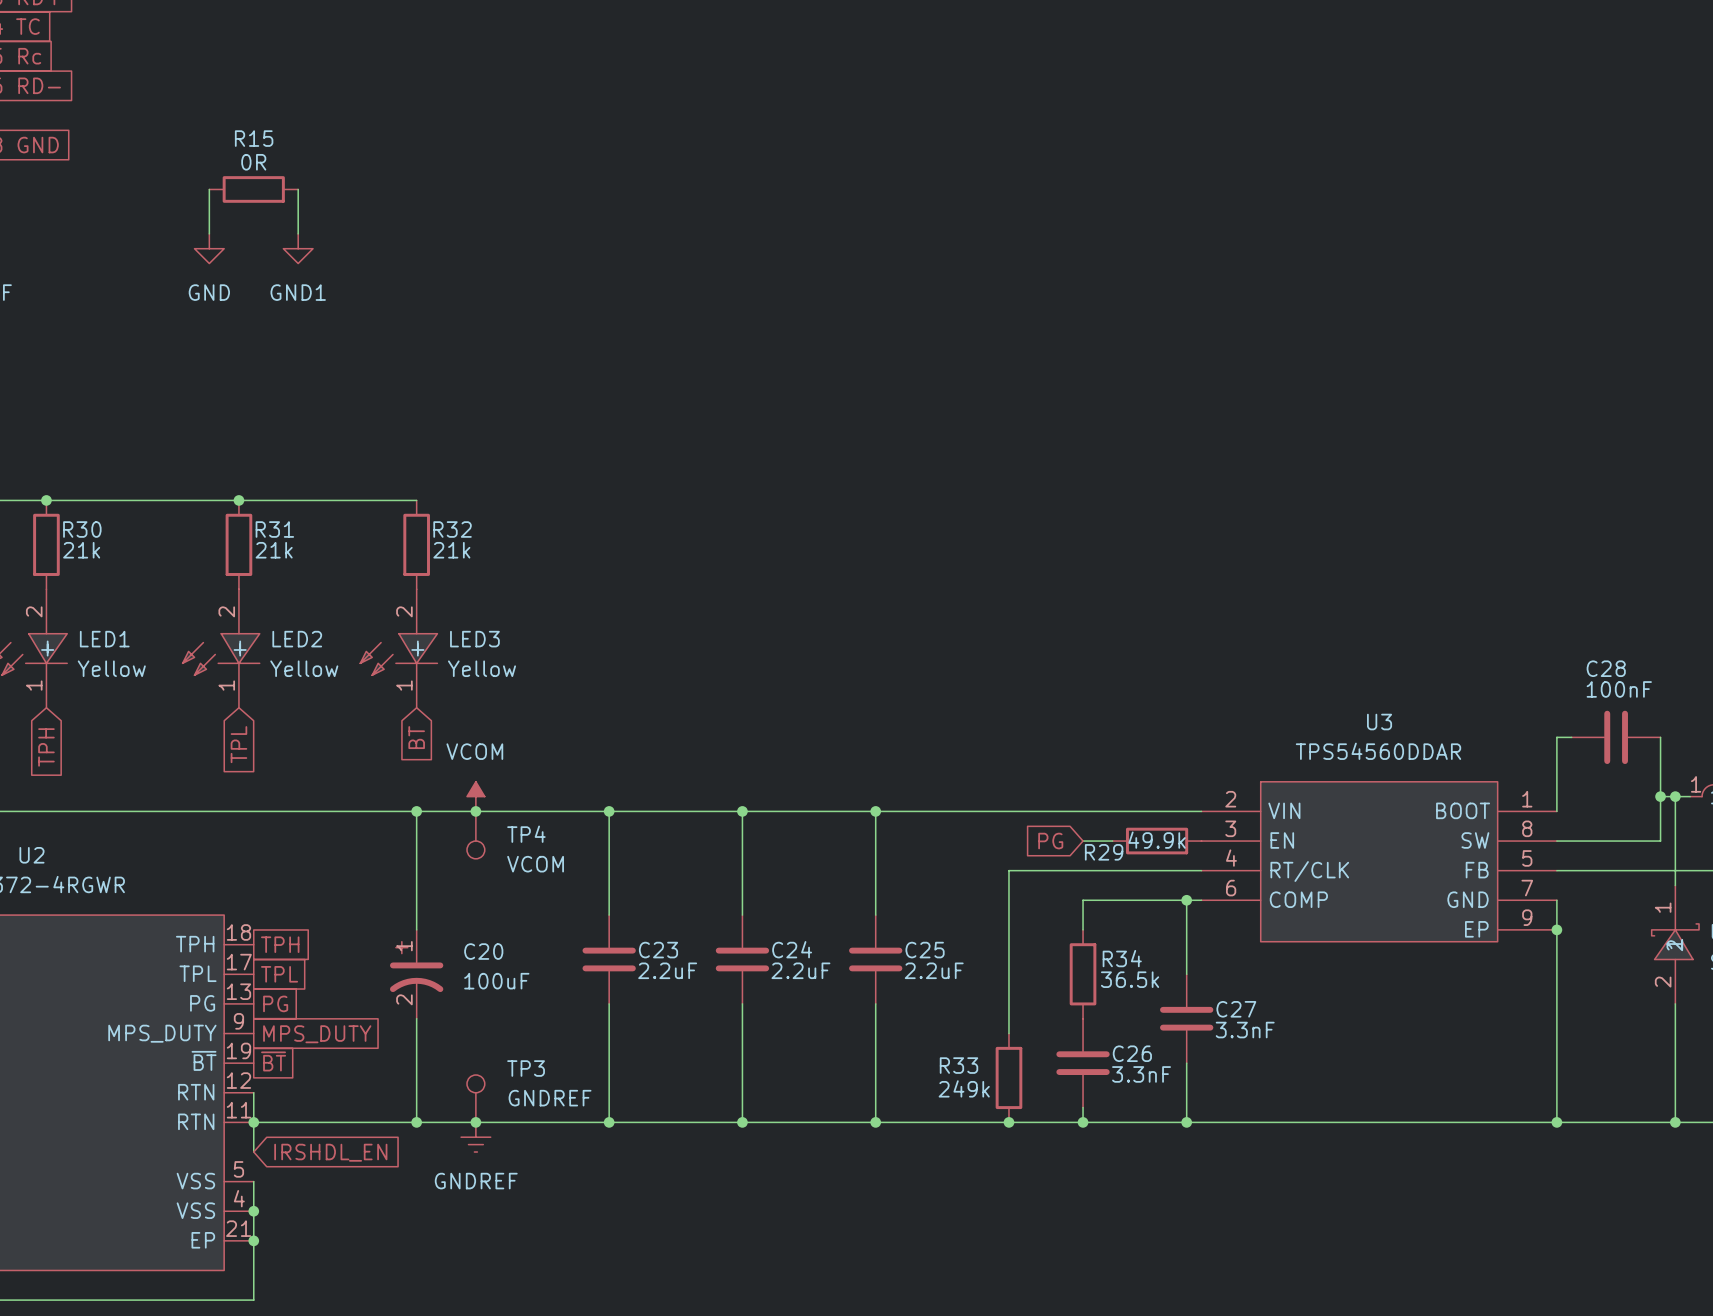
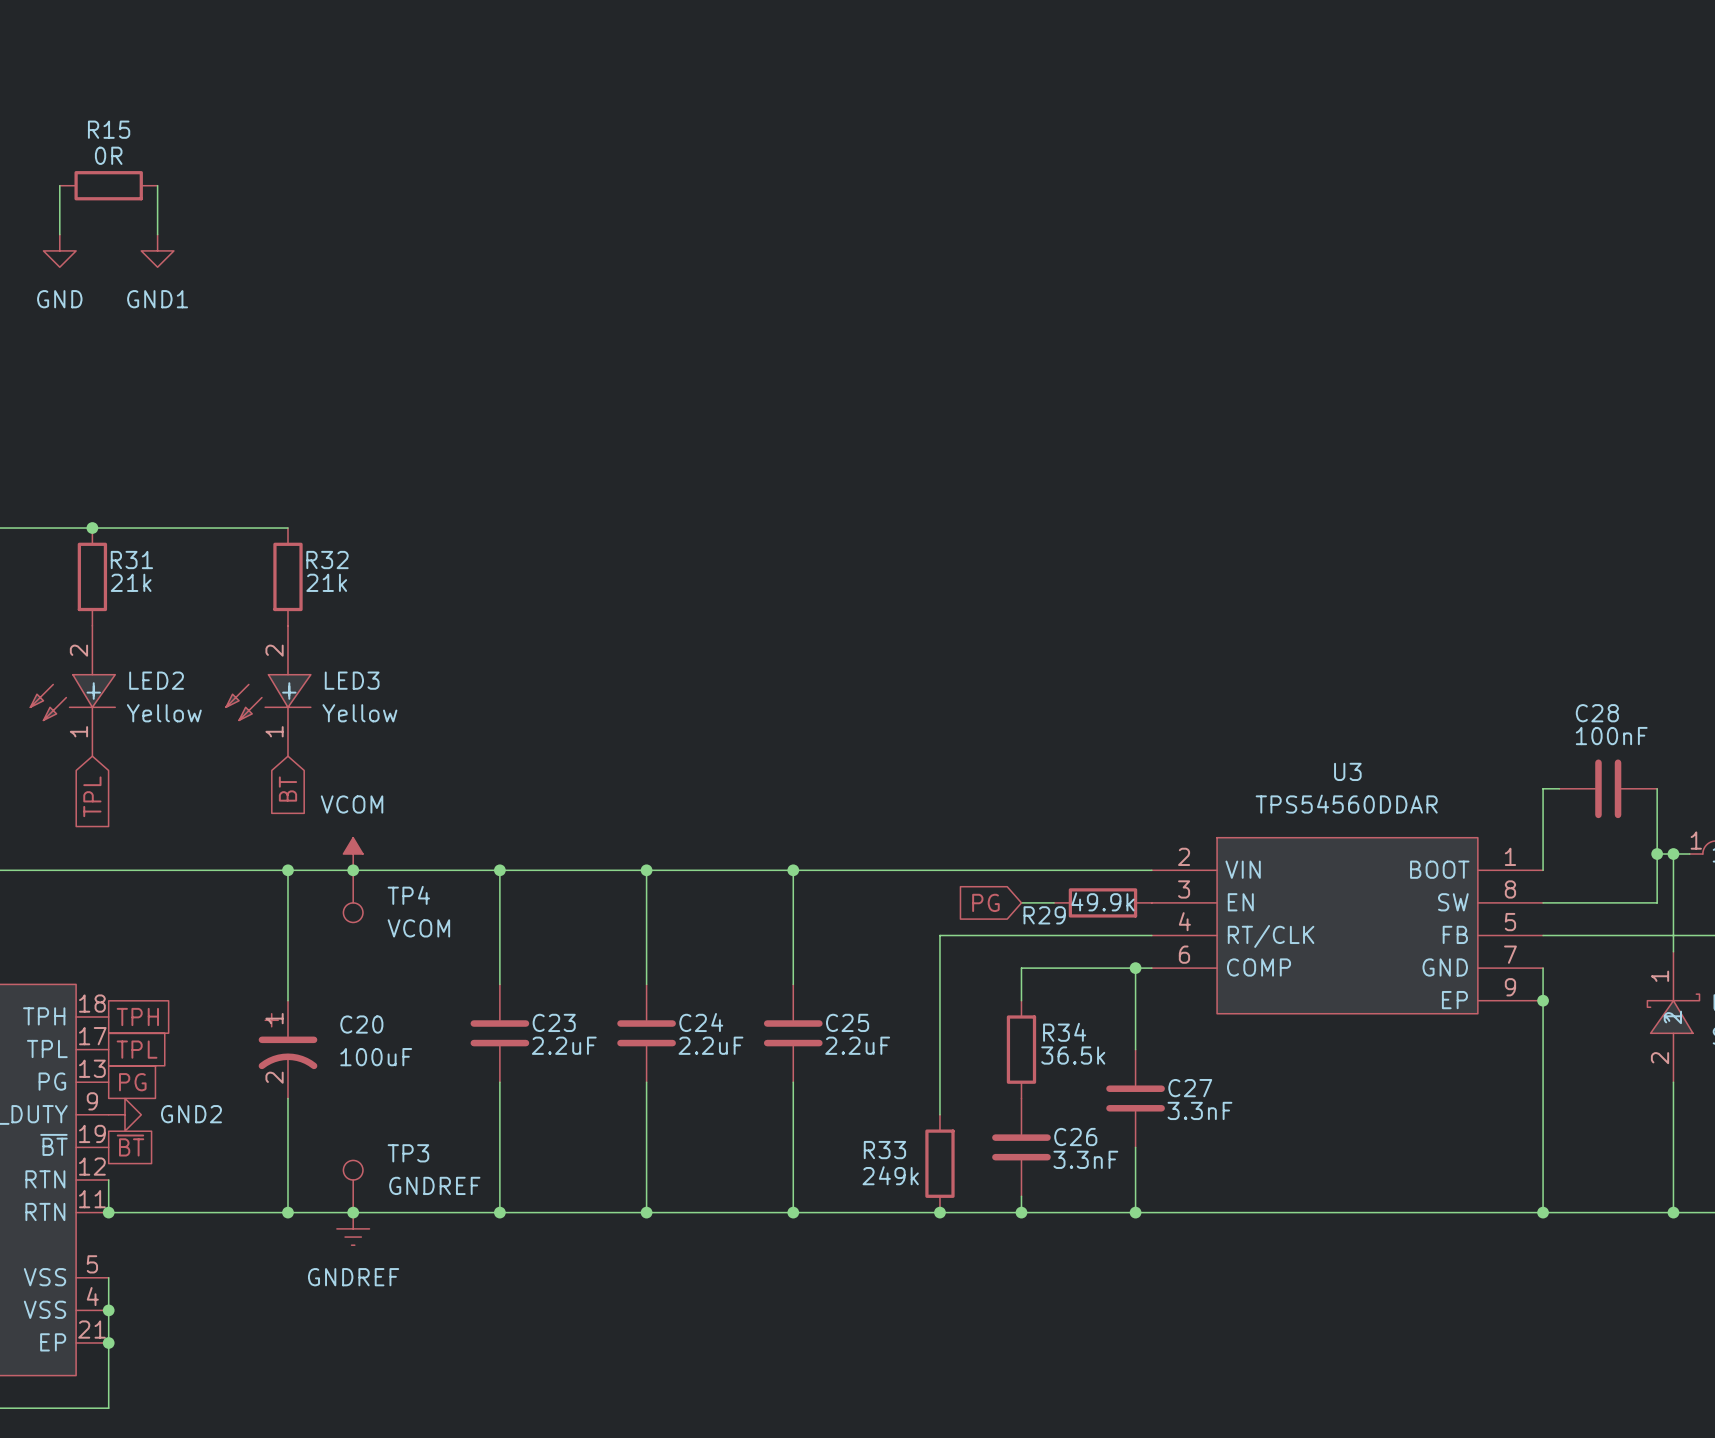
power symbol: none -> GND2 (124, 1114)
global label: MPS_DUTY (317, 1034) -> none
wire: (253, 1122) (253, 1152) -> none
global label: IRSHDL_EN (330, 1152) -> none

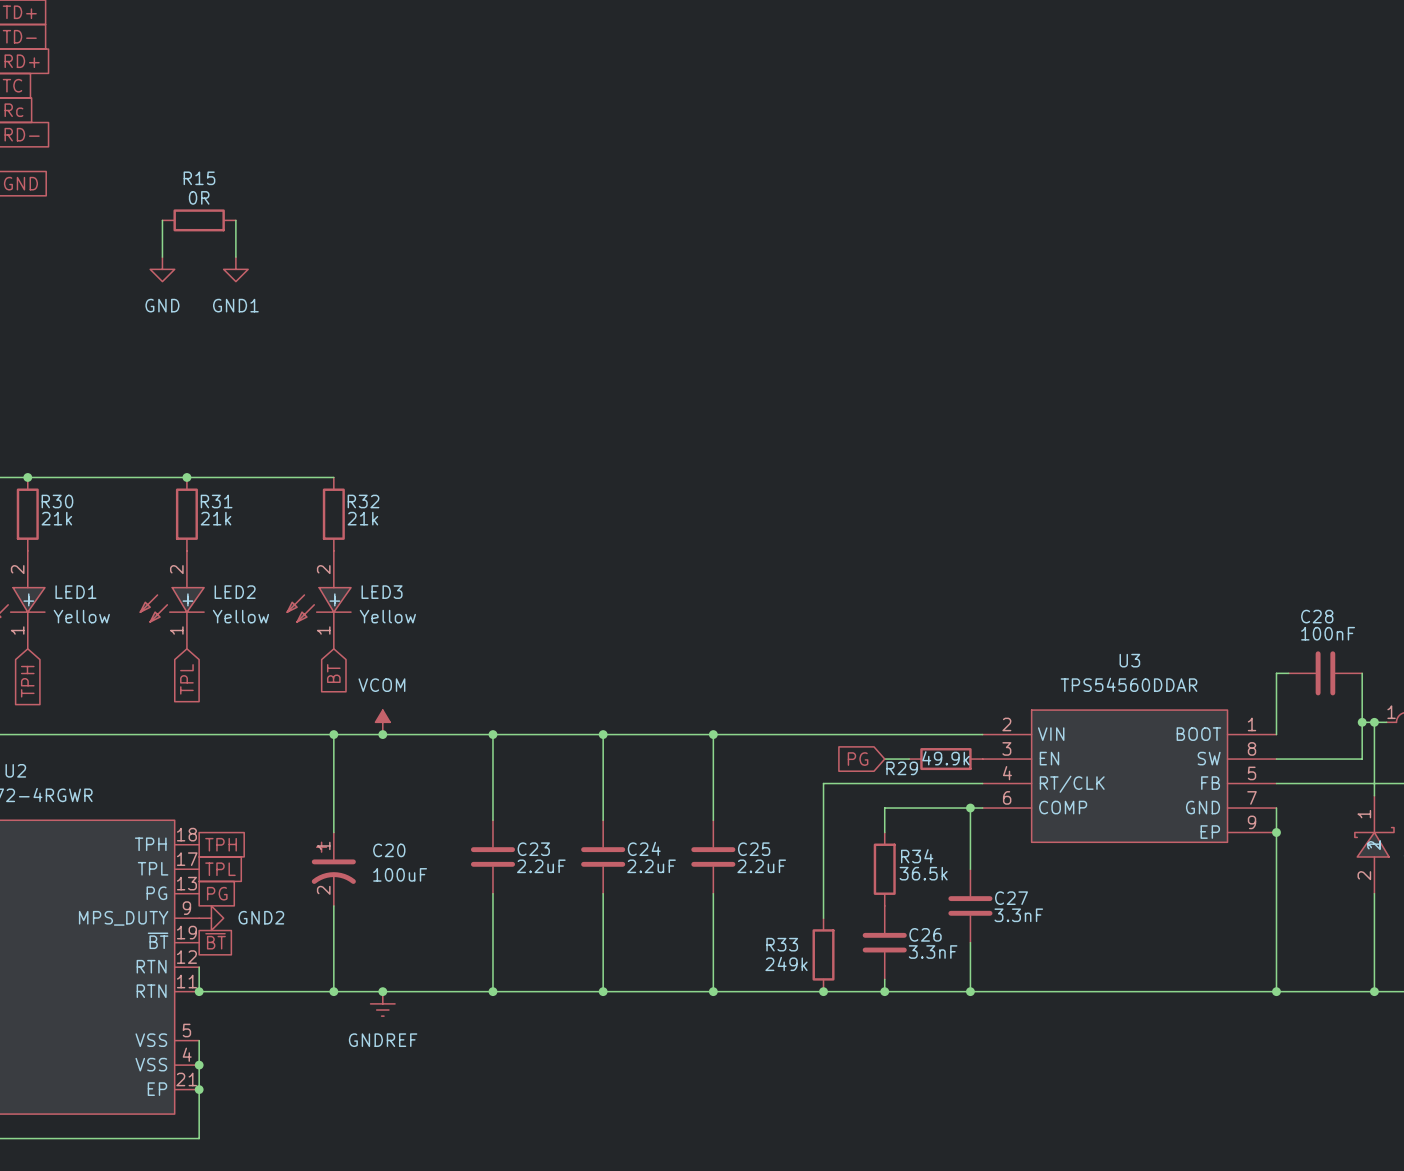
TP4: VCOM (353, 896) -> none
TP3: GNDREF (353, 1186) -> none

